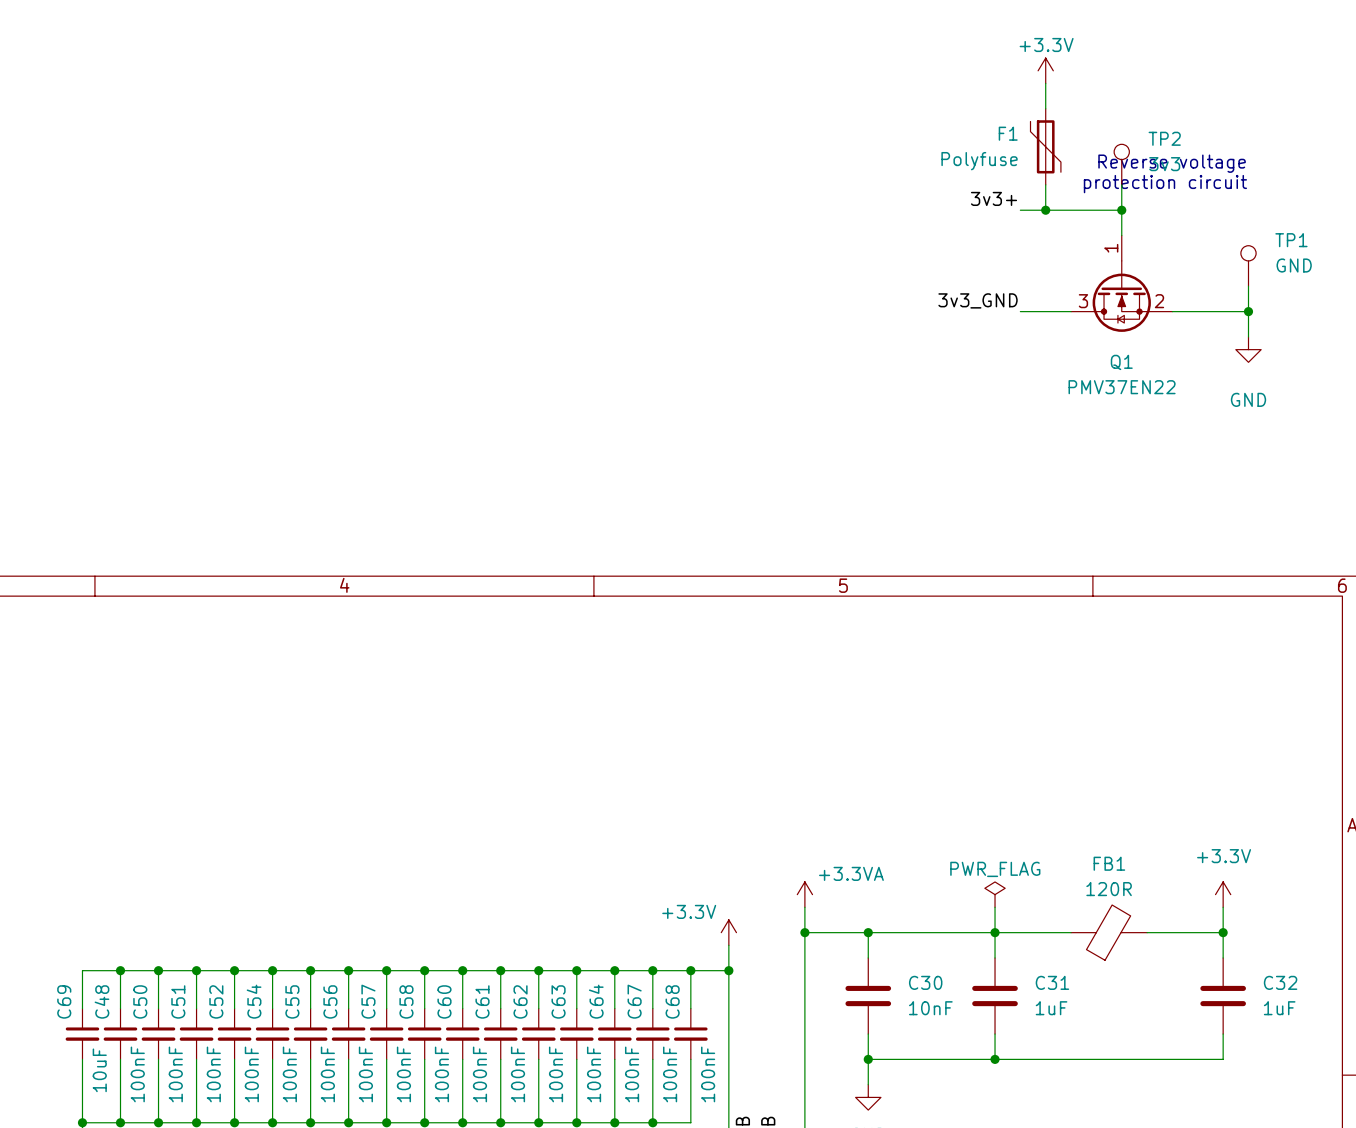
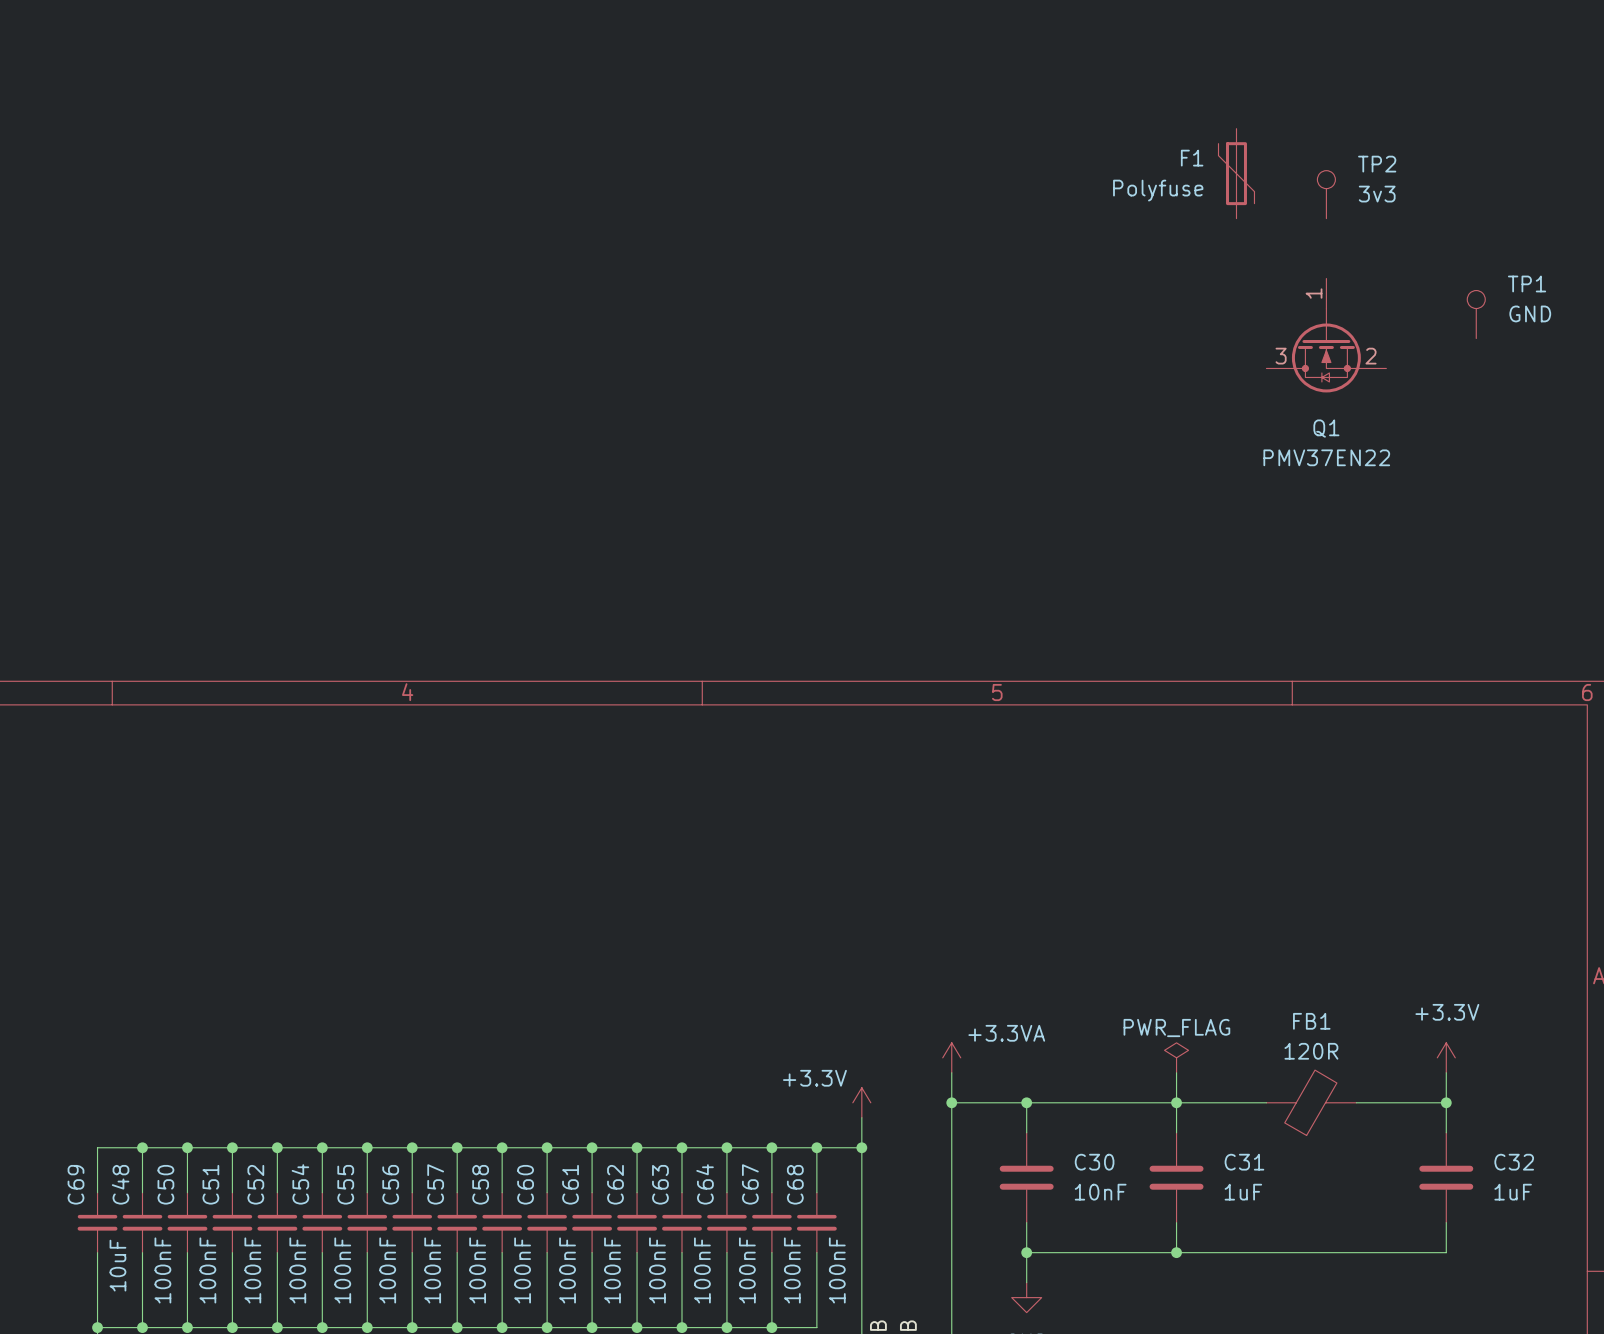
power symbol: +3.3V (1045, 70) -> none
wire: (1045, 83) (1045, 108) -> none
text: Reverse voltage (1172, 163) -> none
wire: (1045, 184) (1045, 210) -> none
wire: (1121, 184) (1121, 235) -> none
text: protection circuit (1165, 184) -> none
label: 3v3+ (994, 198) -> none
wire: (1020, 210) (1121, 210) -> none
junction: (1045, 210) -> none
junction: (1121, 210) -> none
wire: (1248, 286) (1248, 336) -> none
label: 3v3_GND (978, 300) -> none
wire: (1020, 311) (1071, 311) -> none
wire: (1172, 311) (1248, 311) -> none
junction: (1248, 311) -> none
power symbol: GND (1248, 349) -> none

